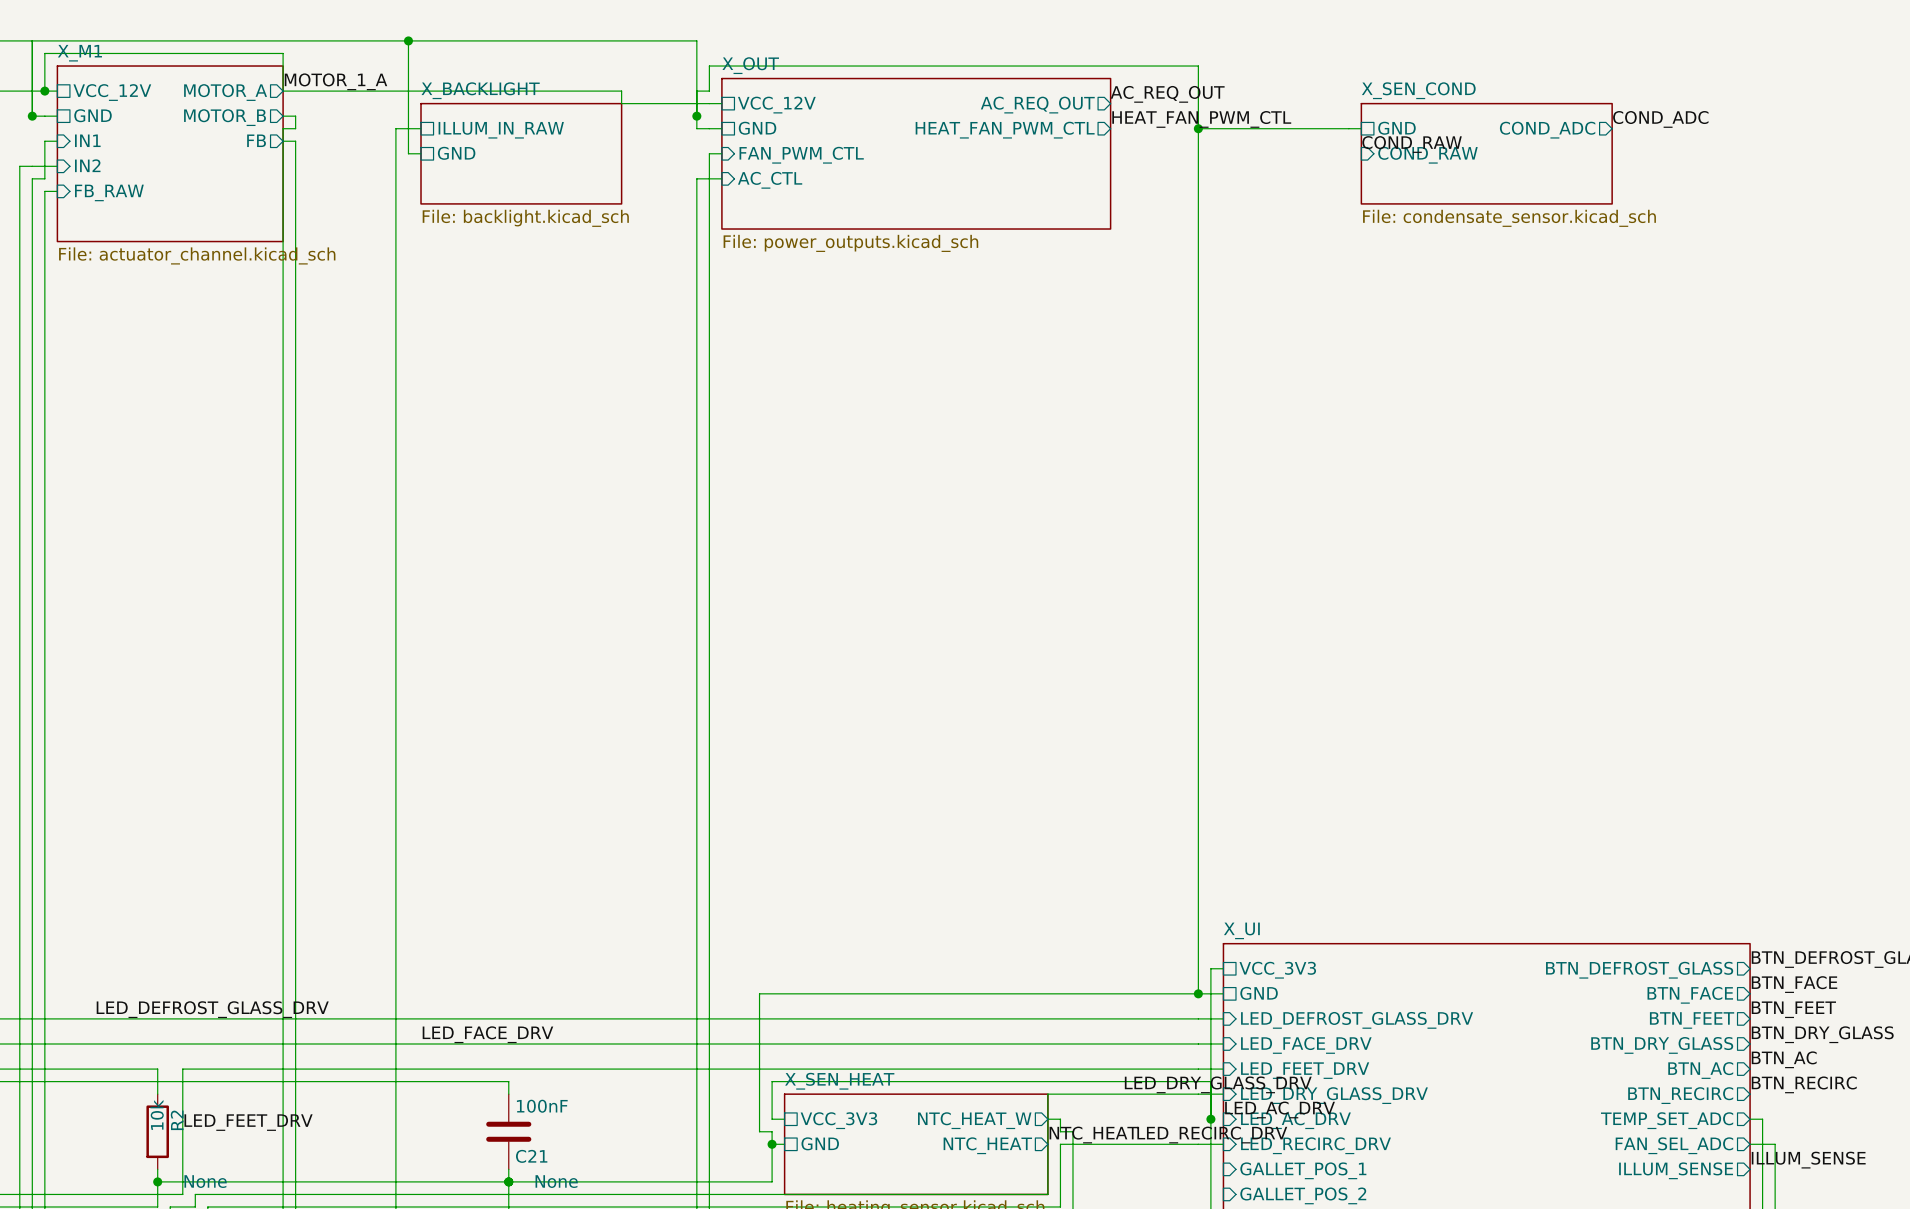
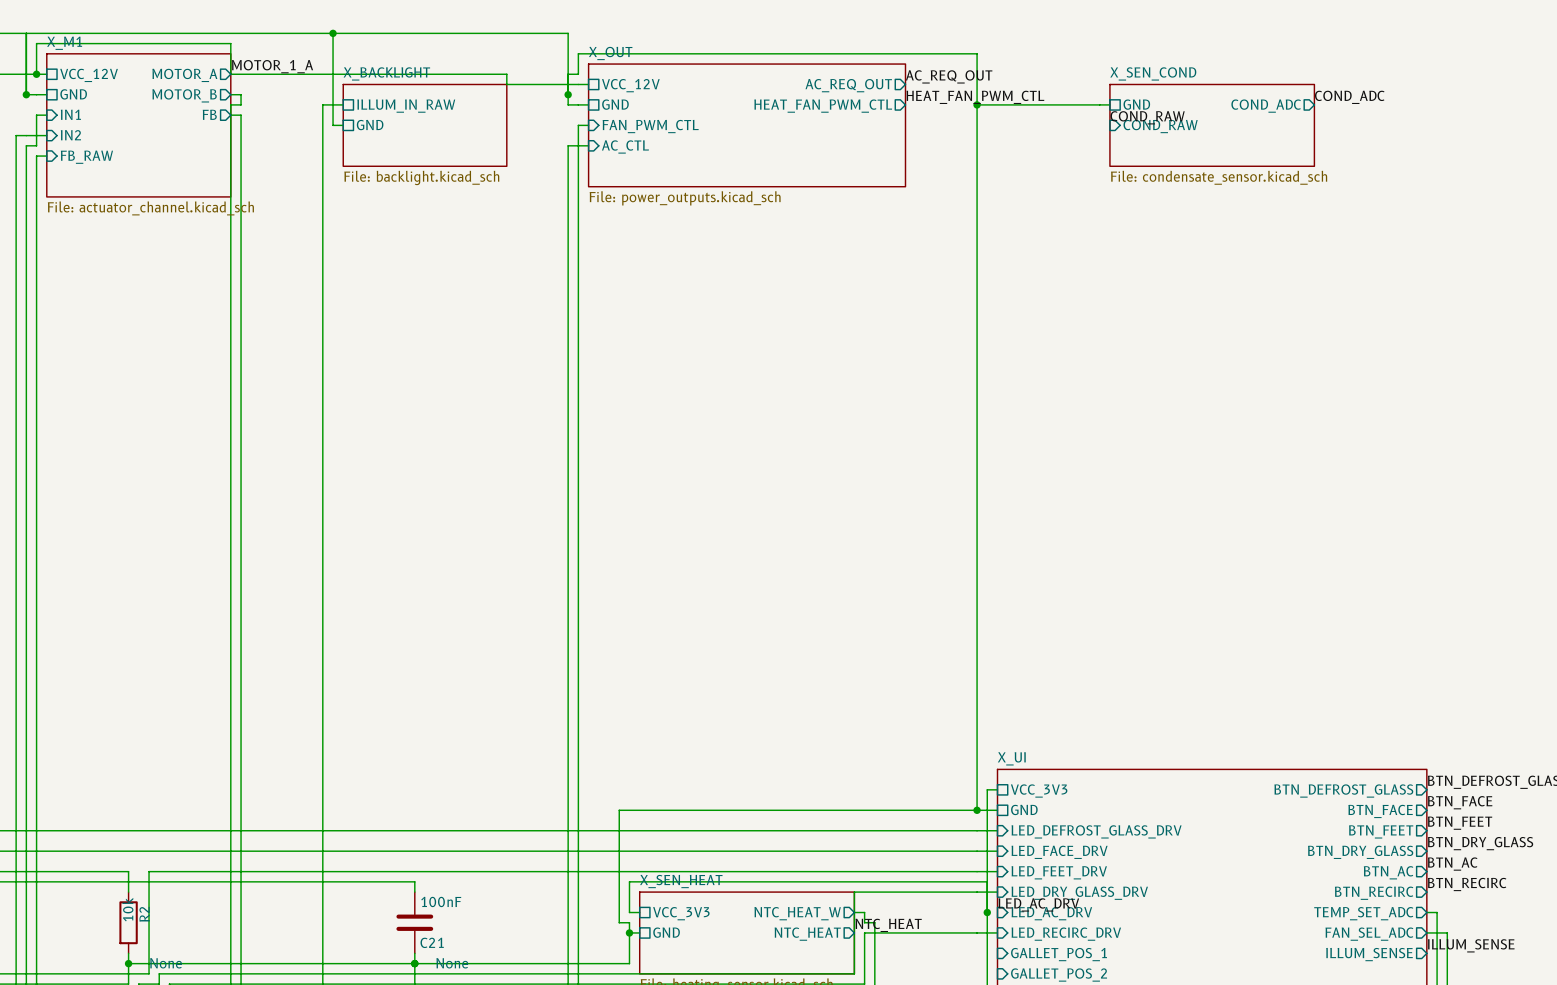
label: LED_DEFROST_GLASS_DRV (212, 1009) -> none
label: LED_FACE_DRV (487, 1034) -> none
label: LED_DRY_GLASS_DRV (1218, 1084) -> none
label: LED_FEET_DRV (248, 1122) -> none
label: LED_RECIRC_DRV (1212, 1135) -> none

